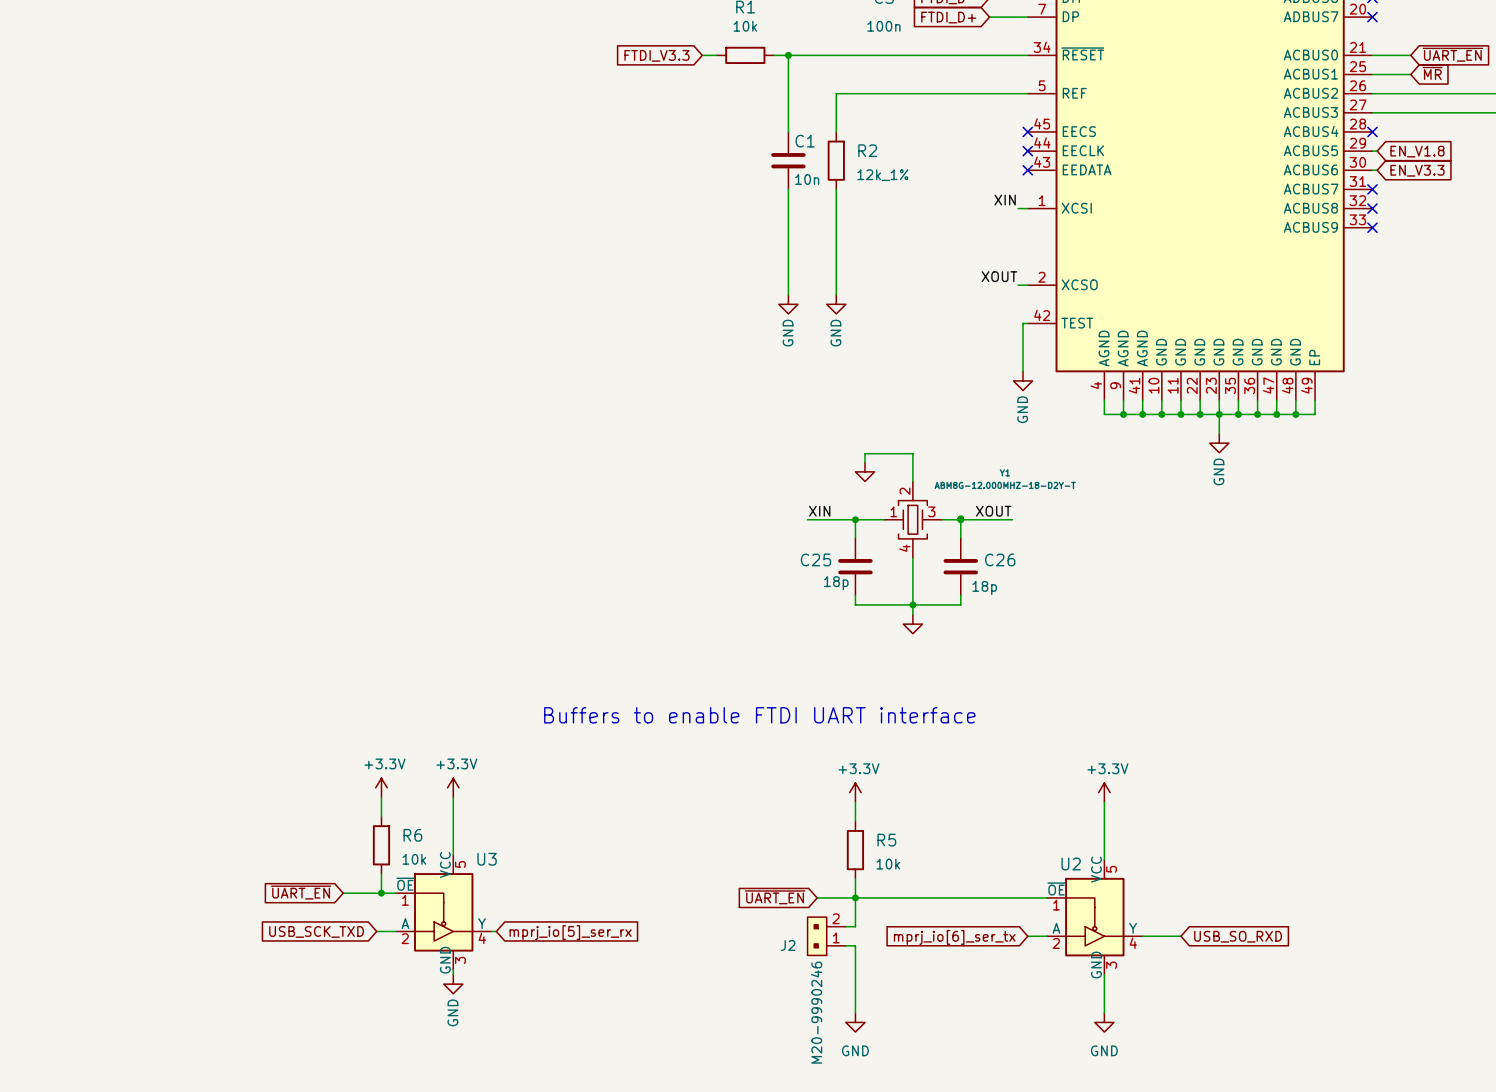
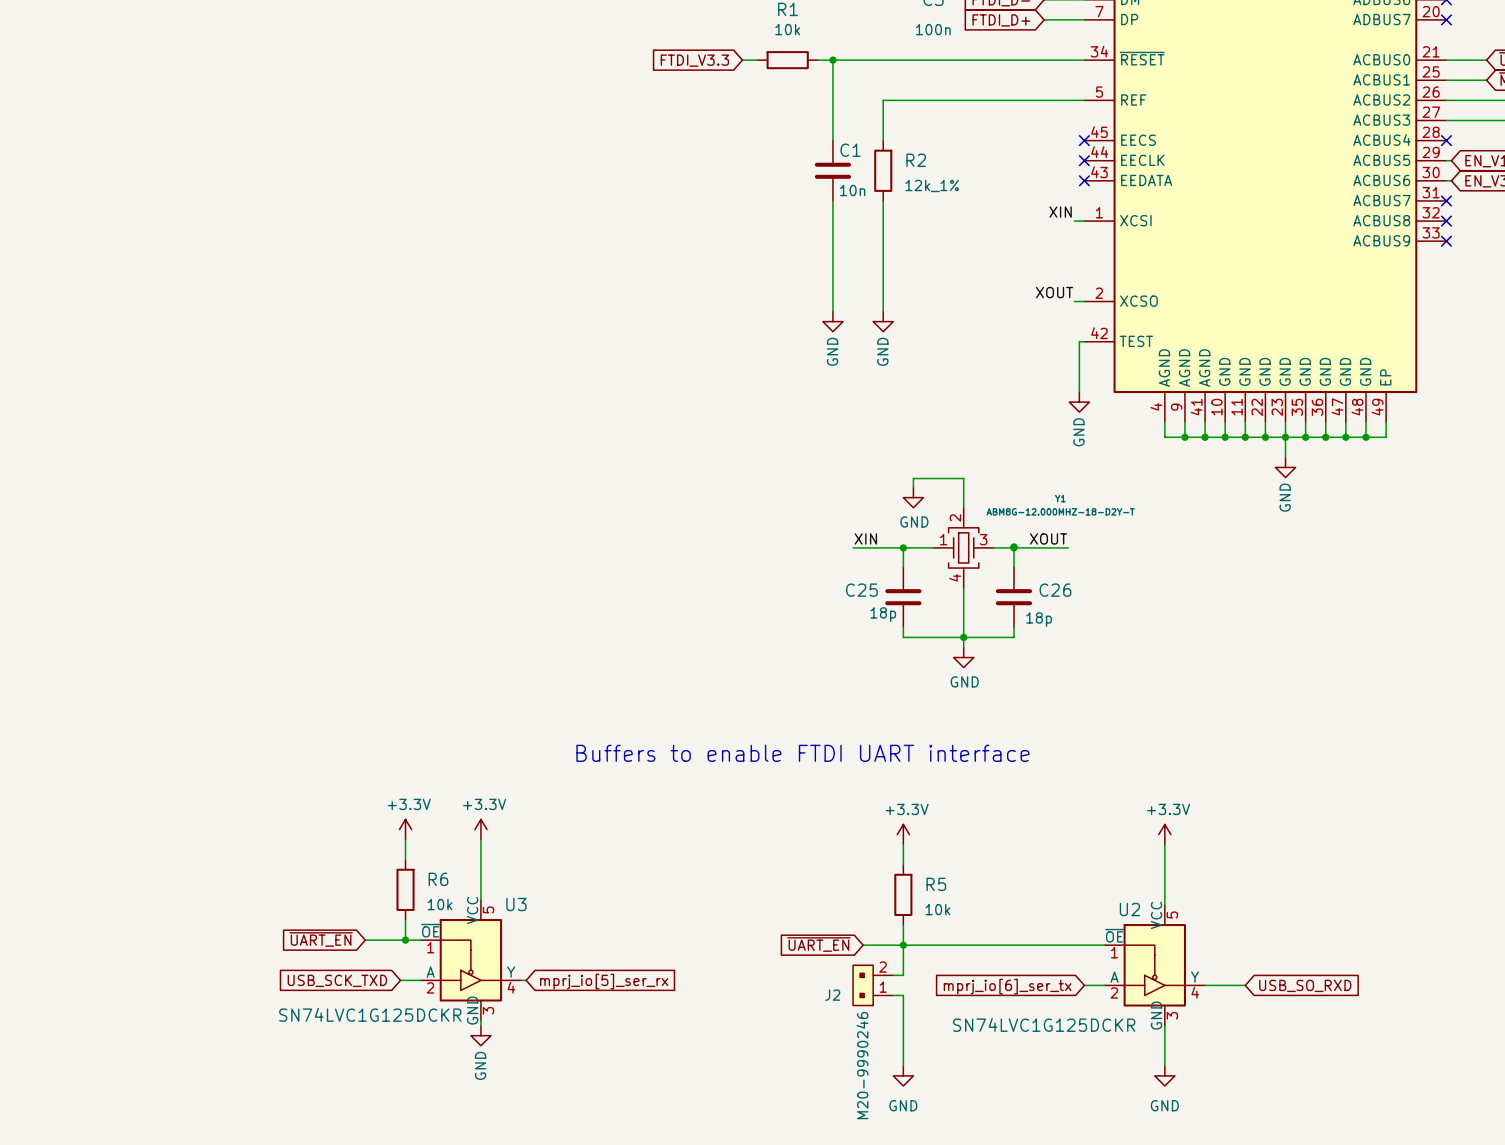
power symbol text: none -> GND (914, 522)
power symbol text: none -> GND (964, 681)
U3 value: none -> SN74LVC1G125DCKR (370, 1014)
U2 value: none -> SN74LVC1G125DCKR (1044, 1024)

